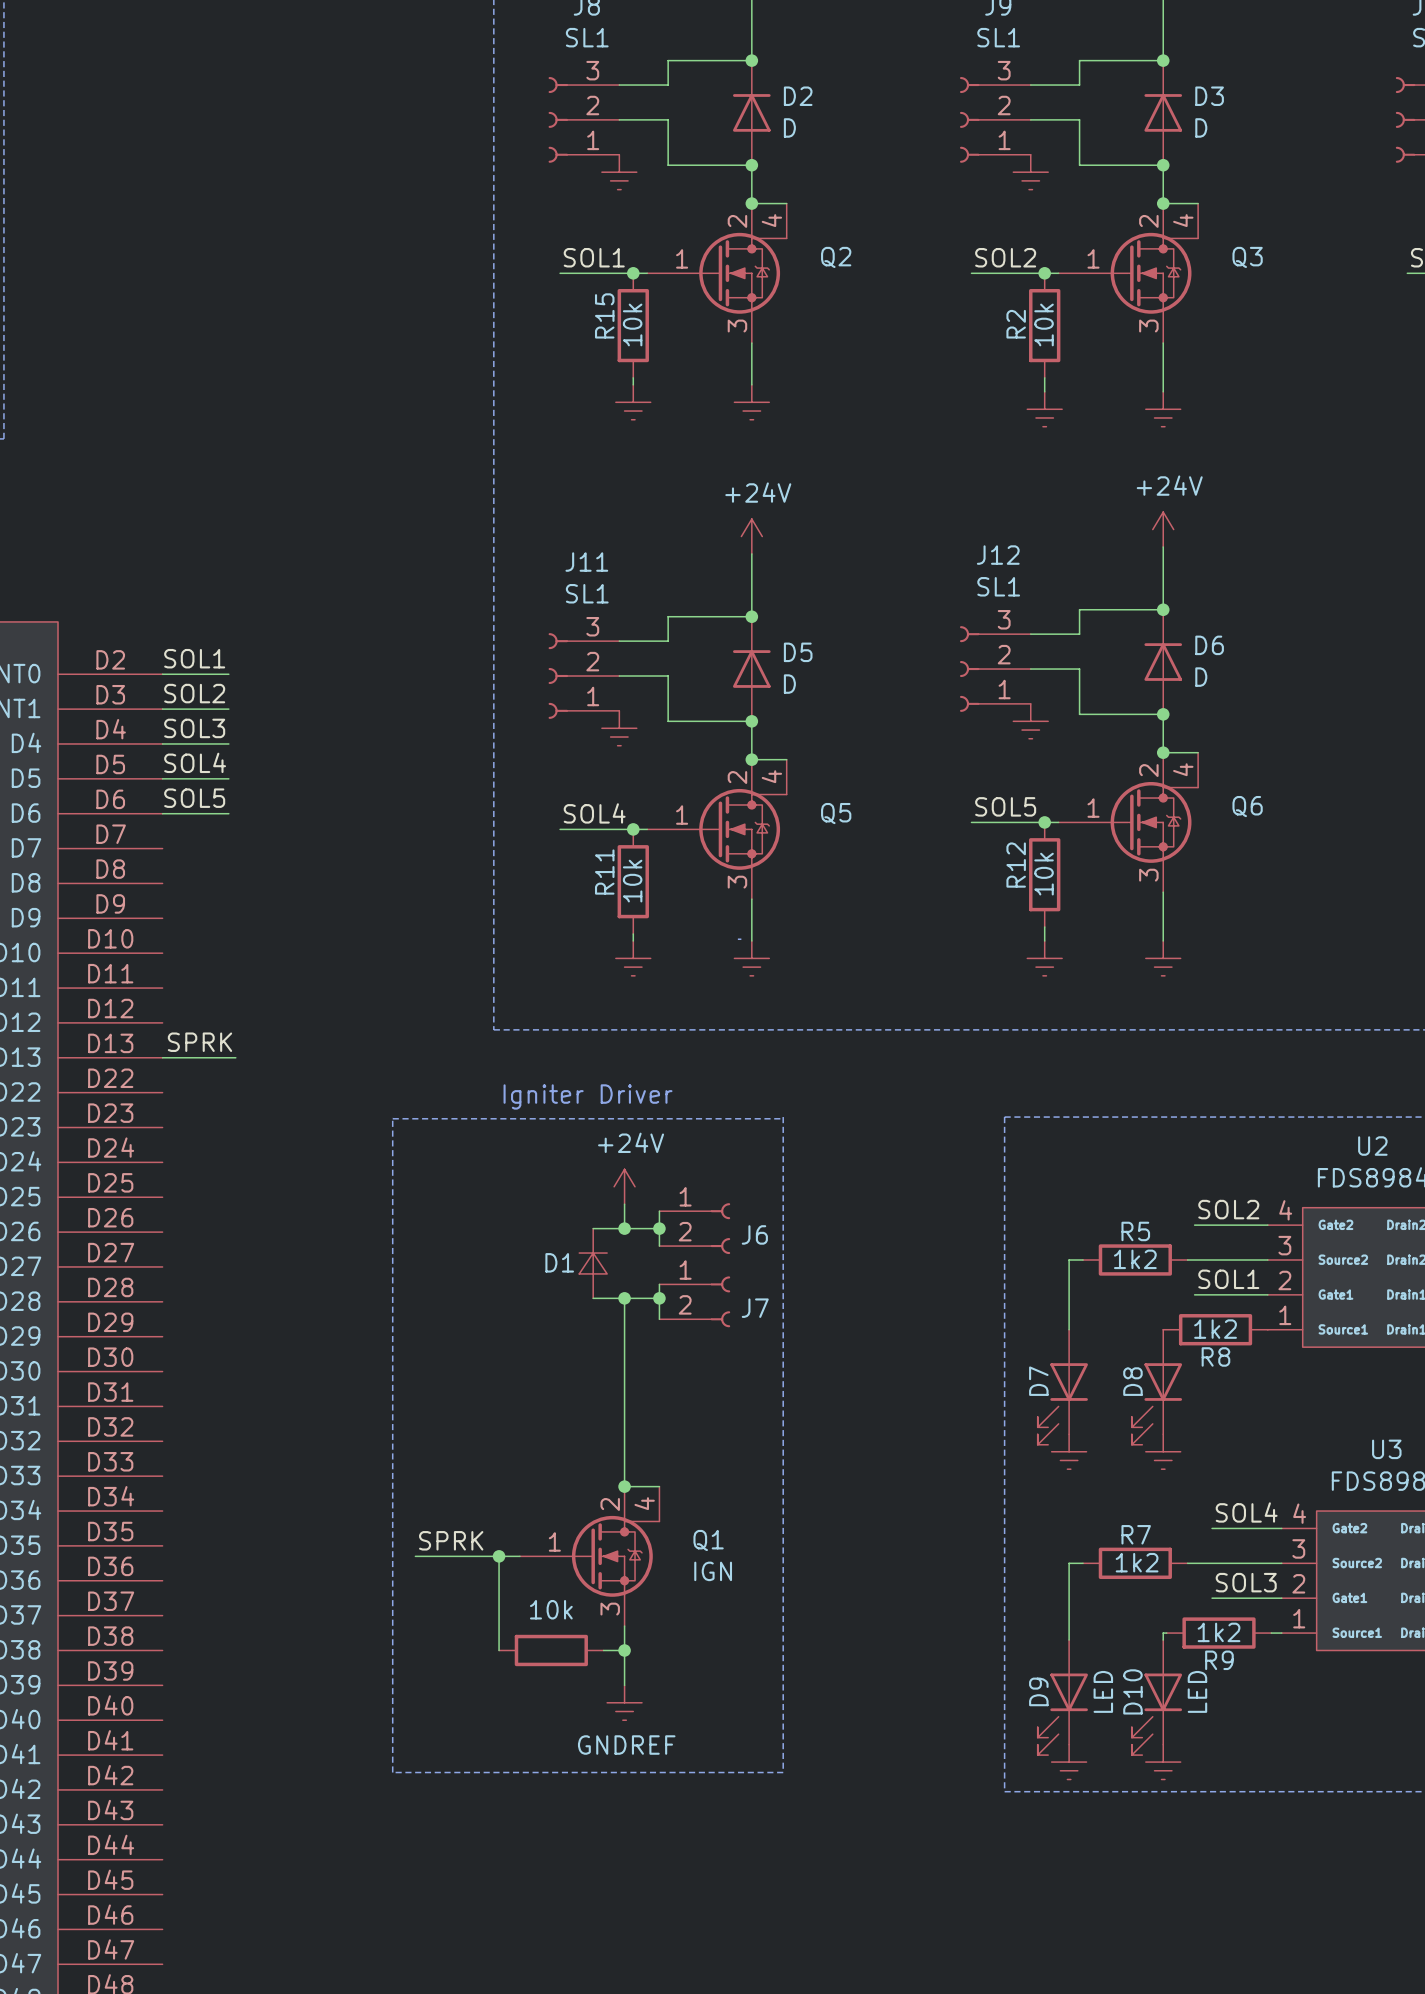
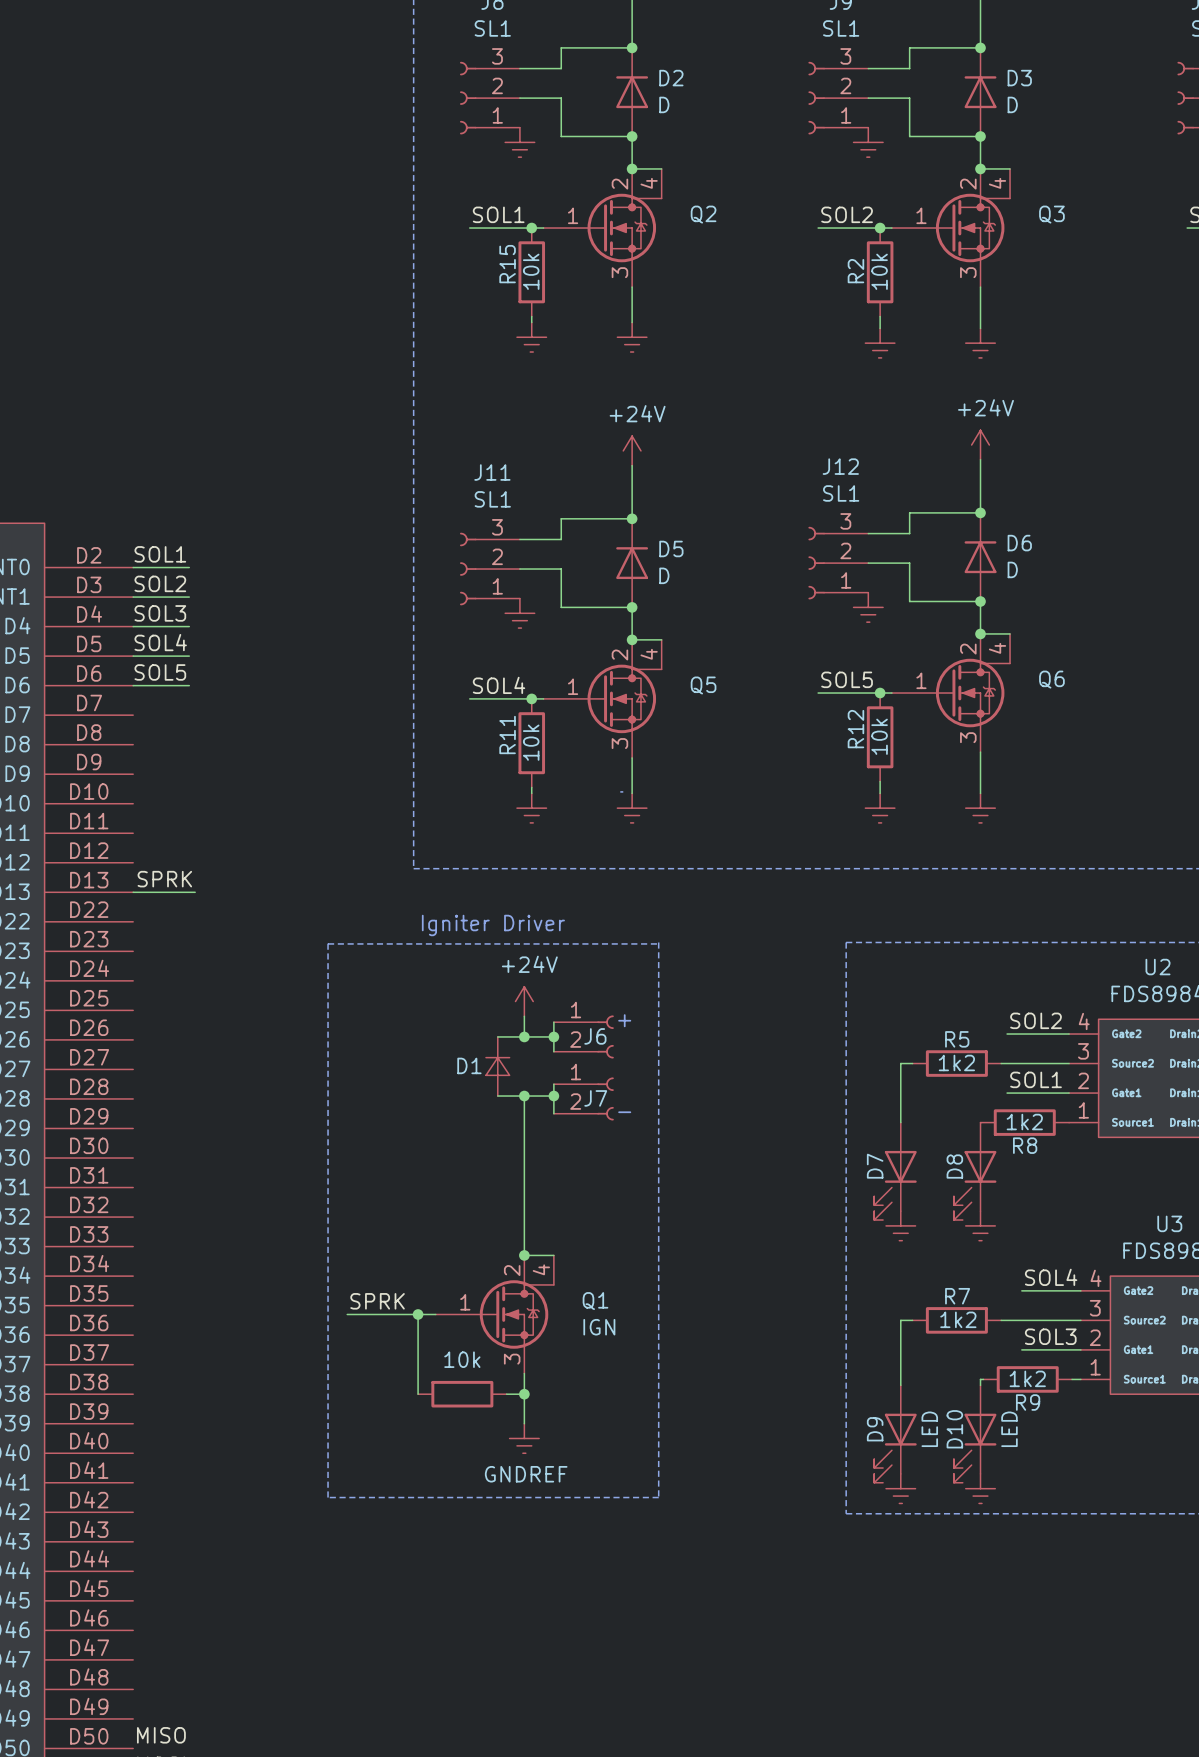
text: none -> + (624, 1020)
J6 name position: J6 (754, 1234) -> J6 (595, 1036)
J7 name position: J7 (755, 1308) -> J7 (595, 1098)
text: none -> - (624, 1112)

